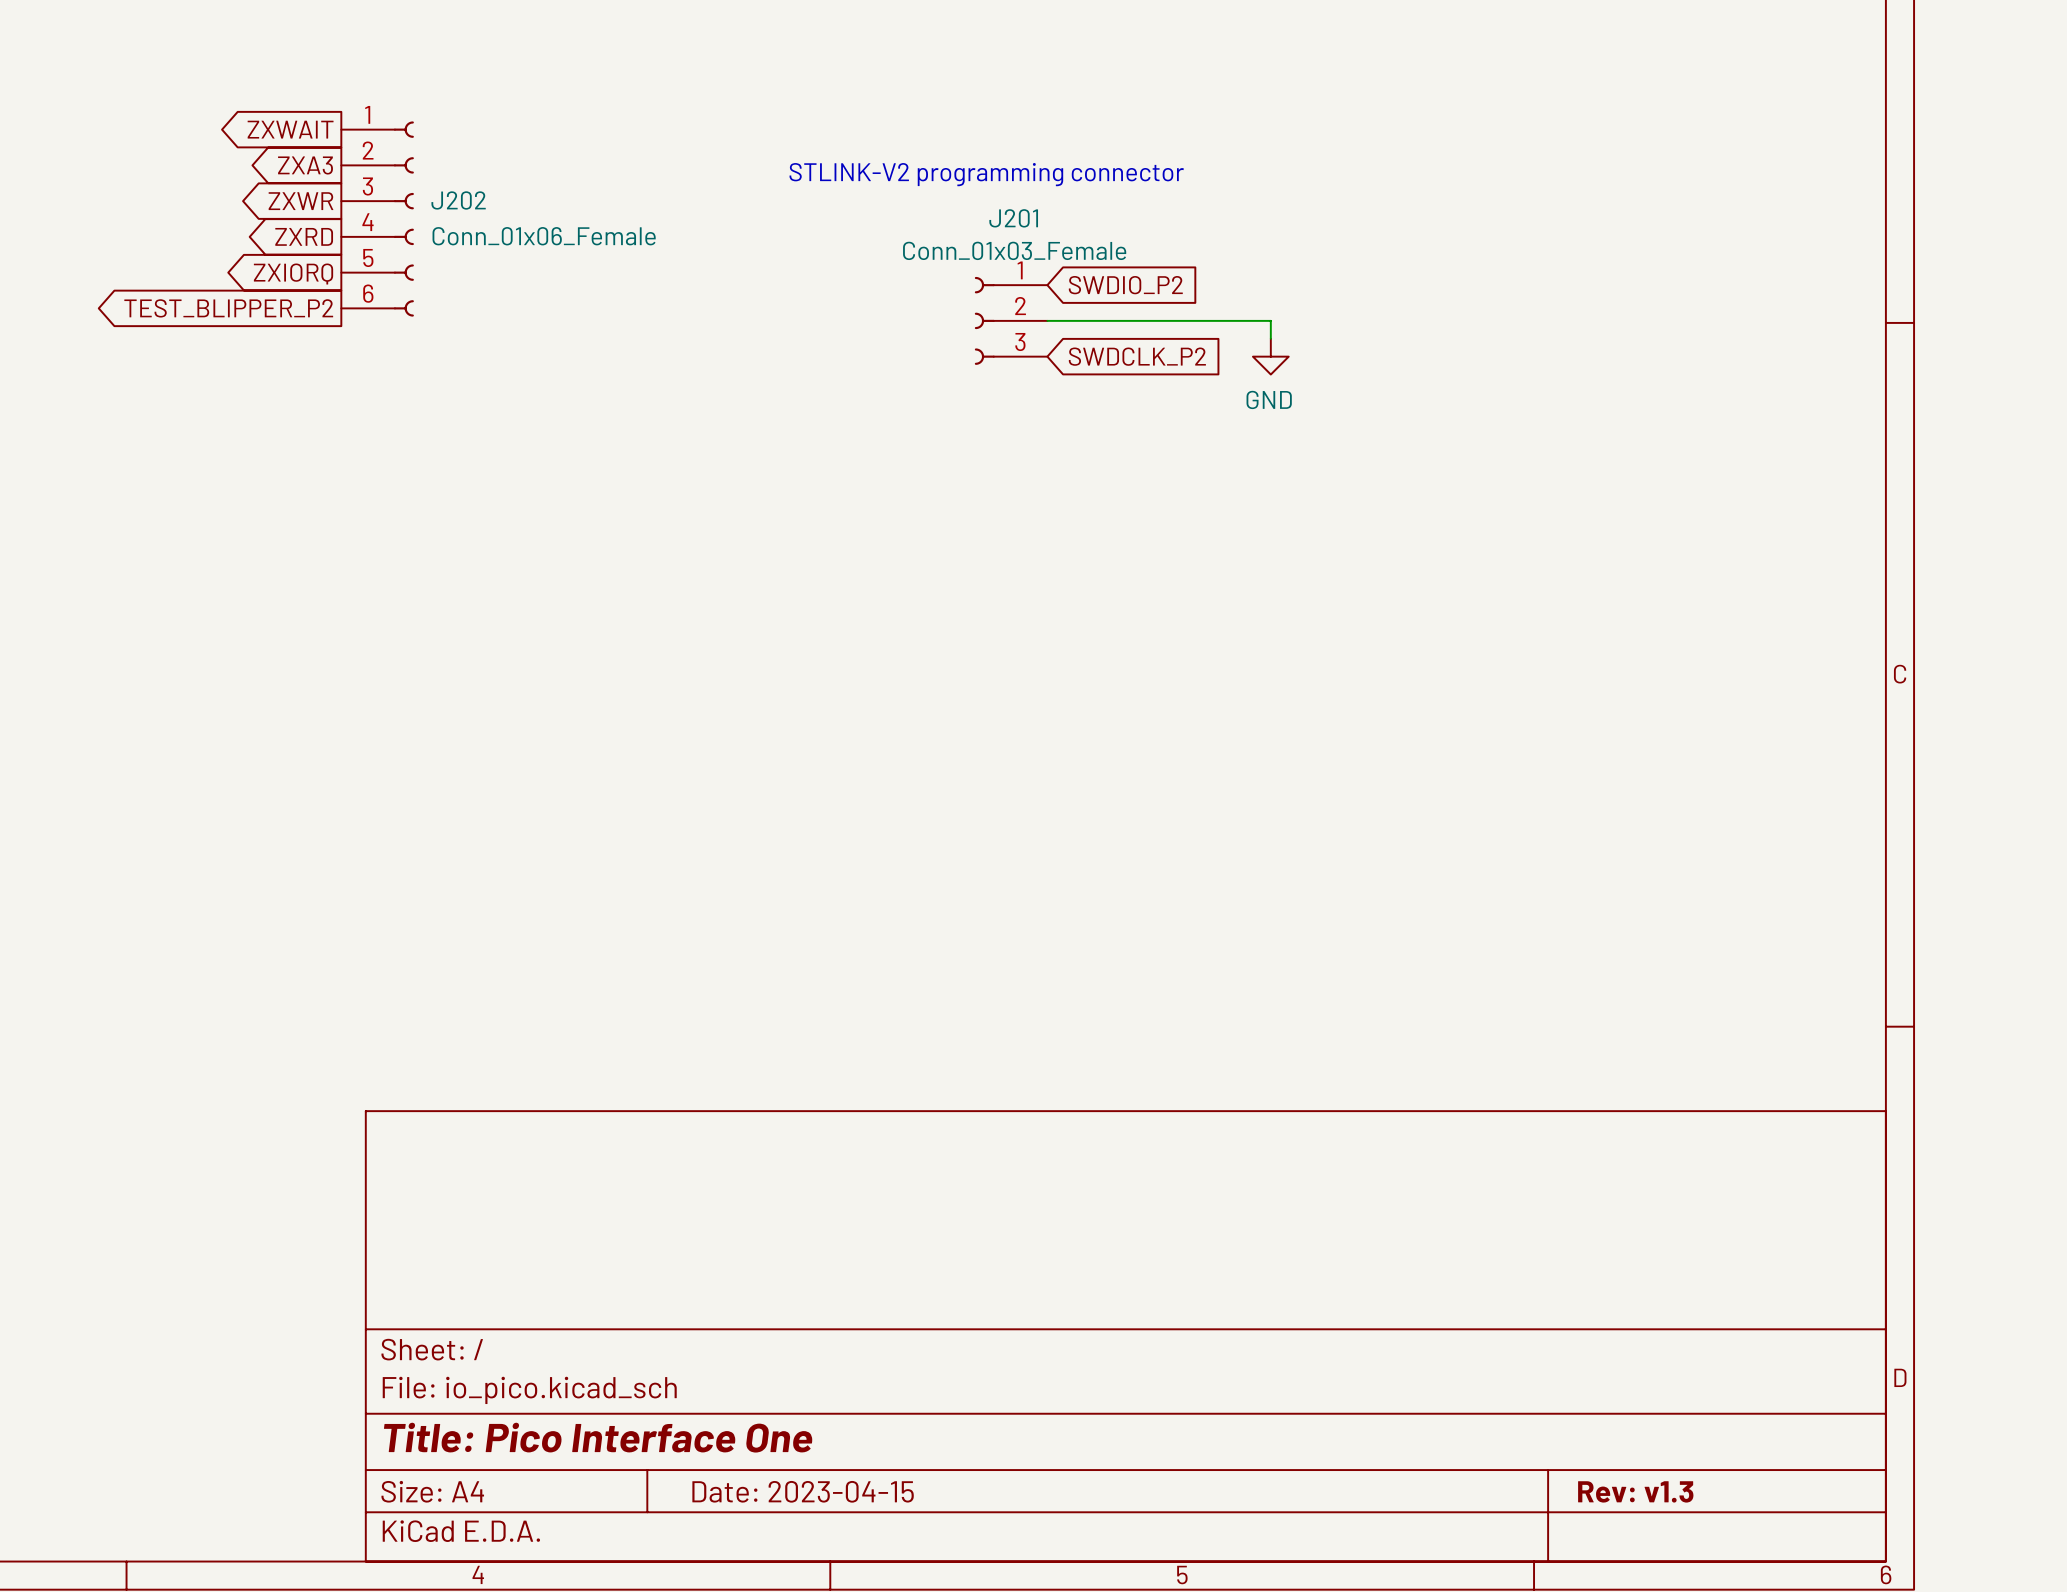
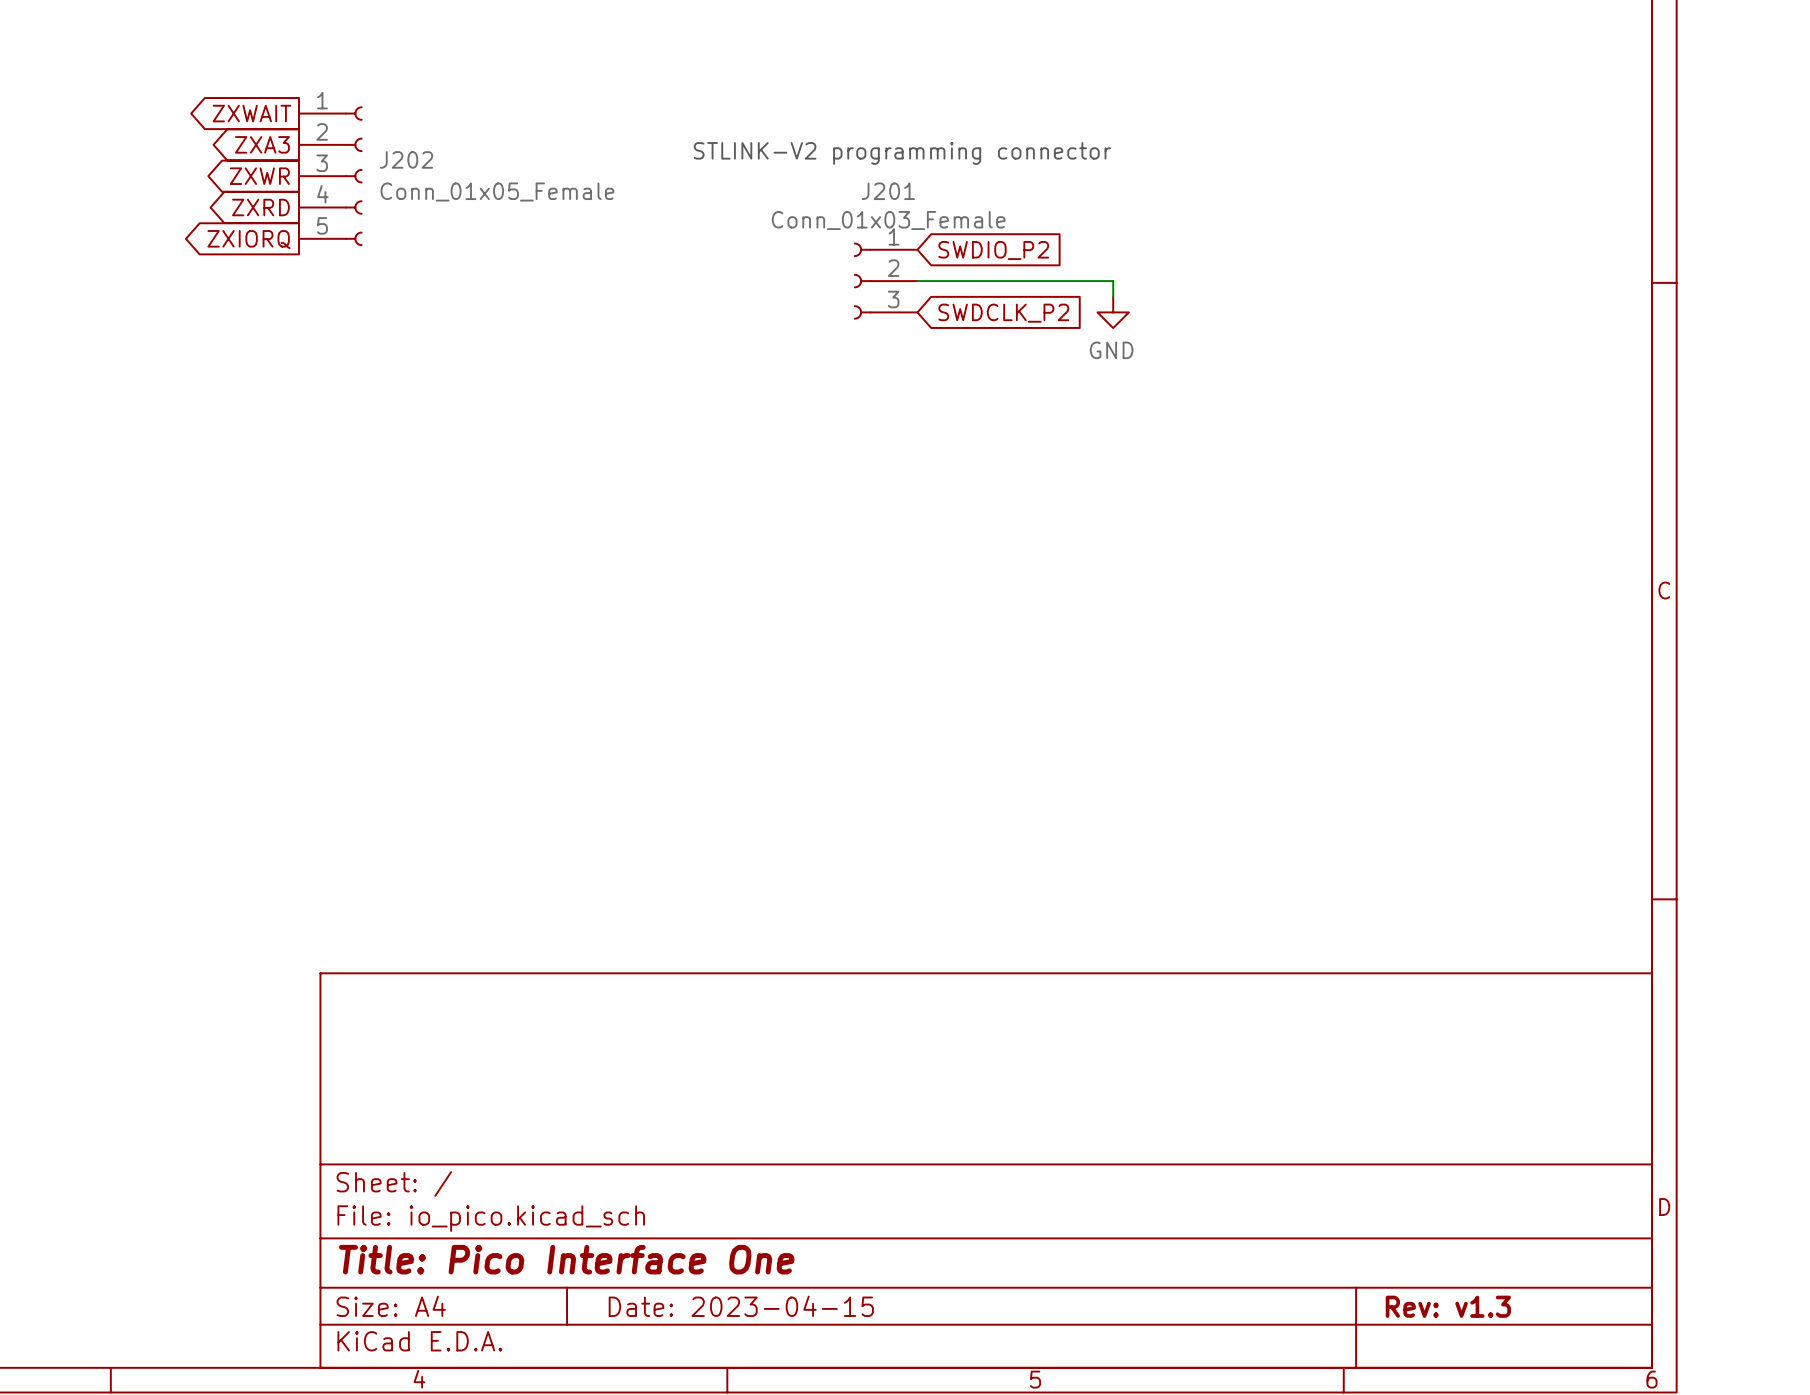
J202 symbol: [341, 121, 414, 317] -> [298, 106, 363, 247]
J202 value: Conn_01x06_Female (544, 236) -> Conn_01x05_Female (497, 192)
global label: TEST_BLIPPER_P2 (228, 308) -> none

